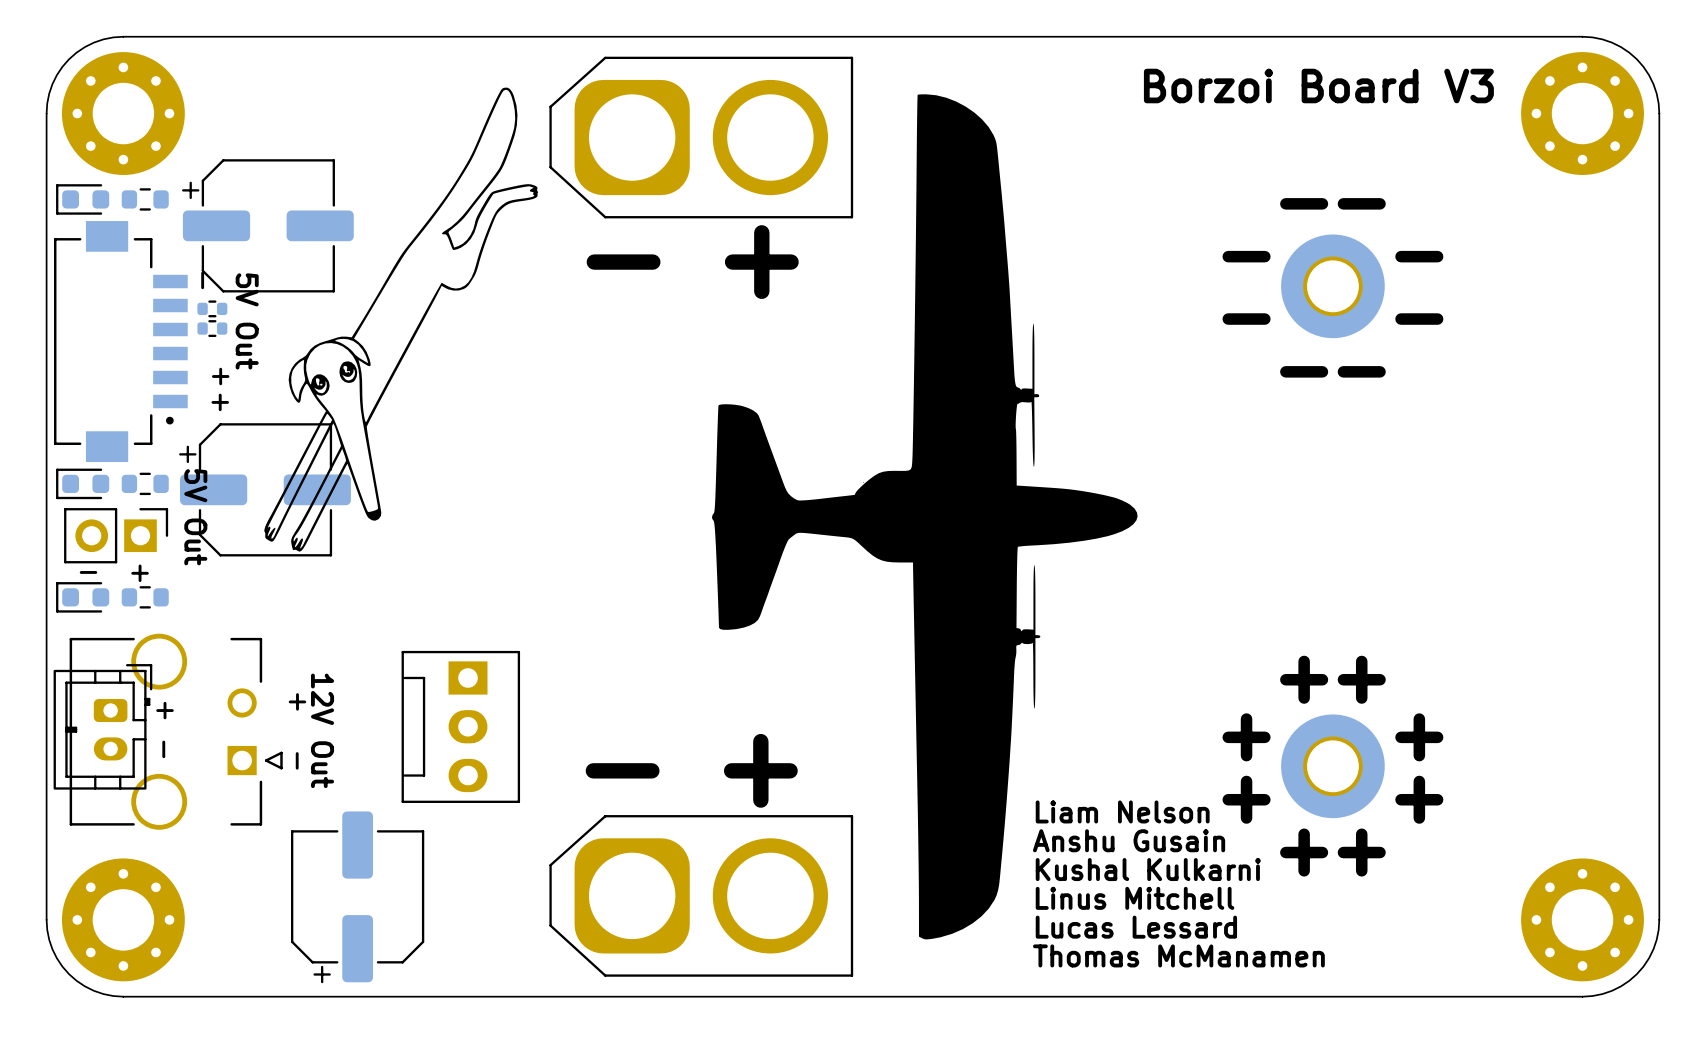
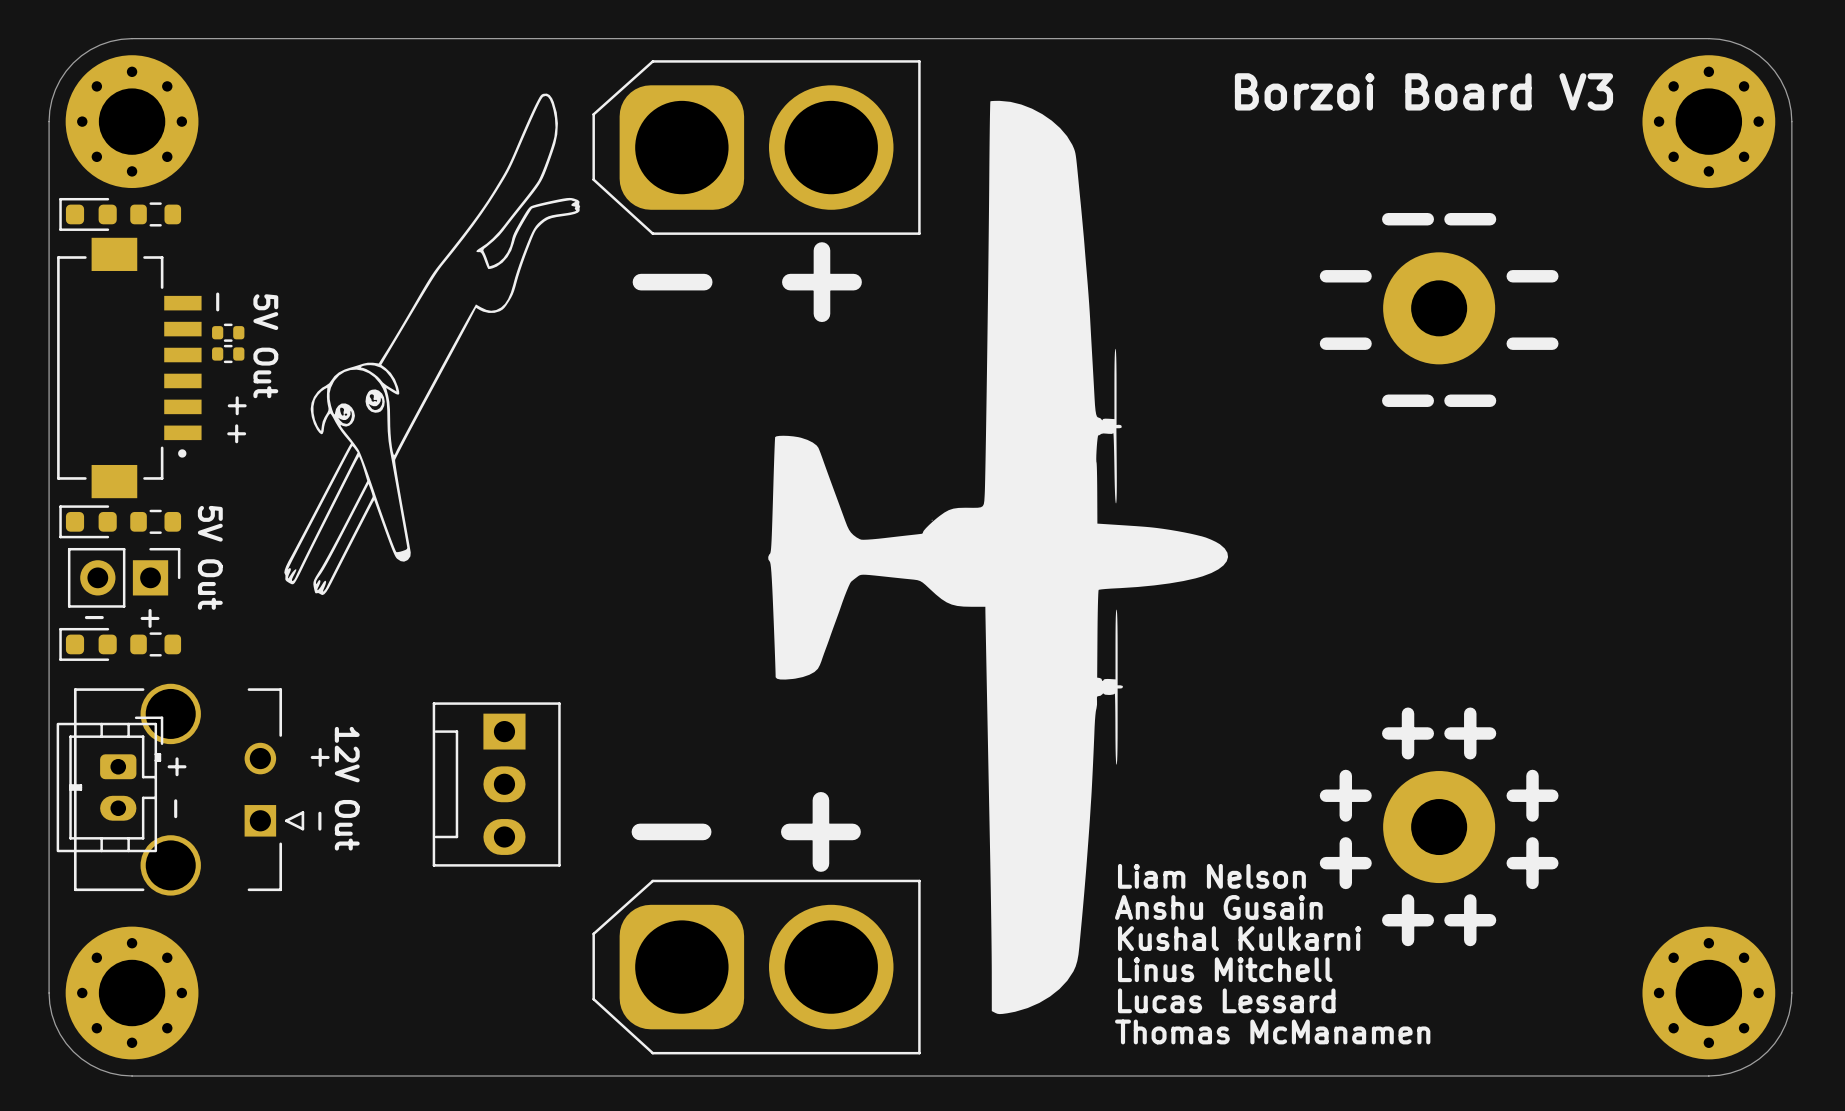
part: (267, 225) -> none
part: (265, 489) -> none
part: (357, 897) -> none

